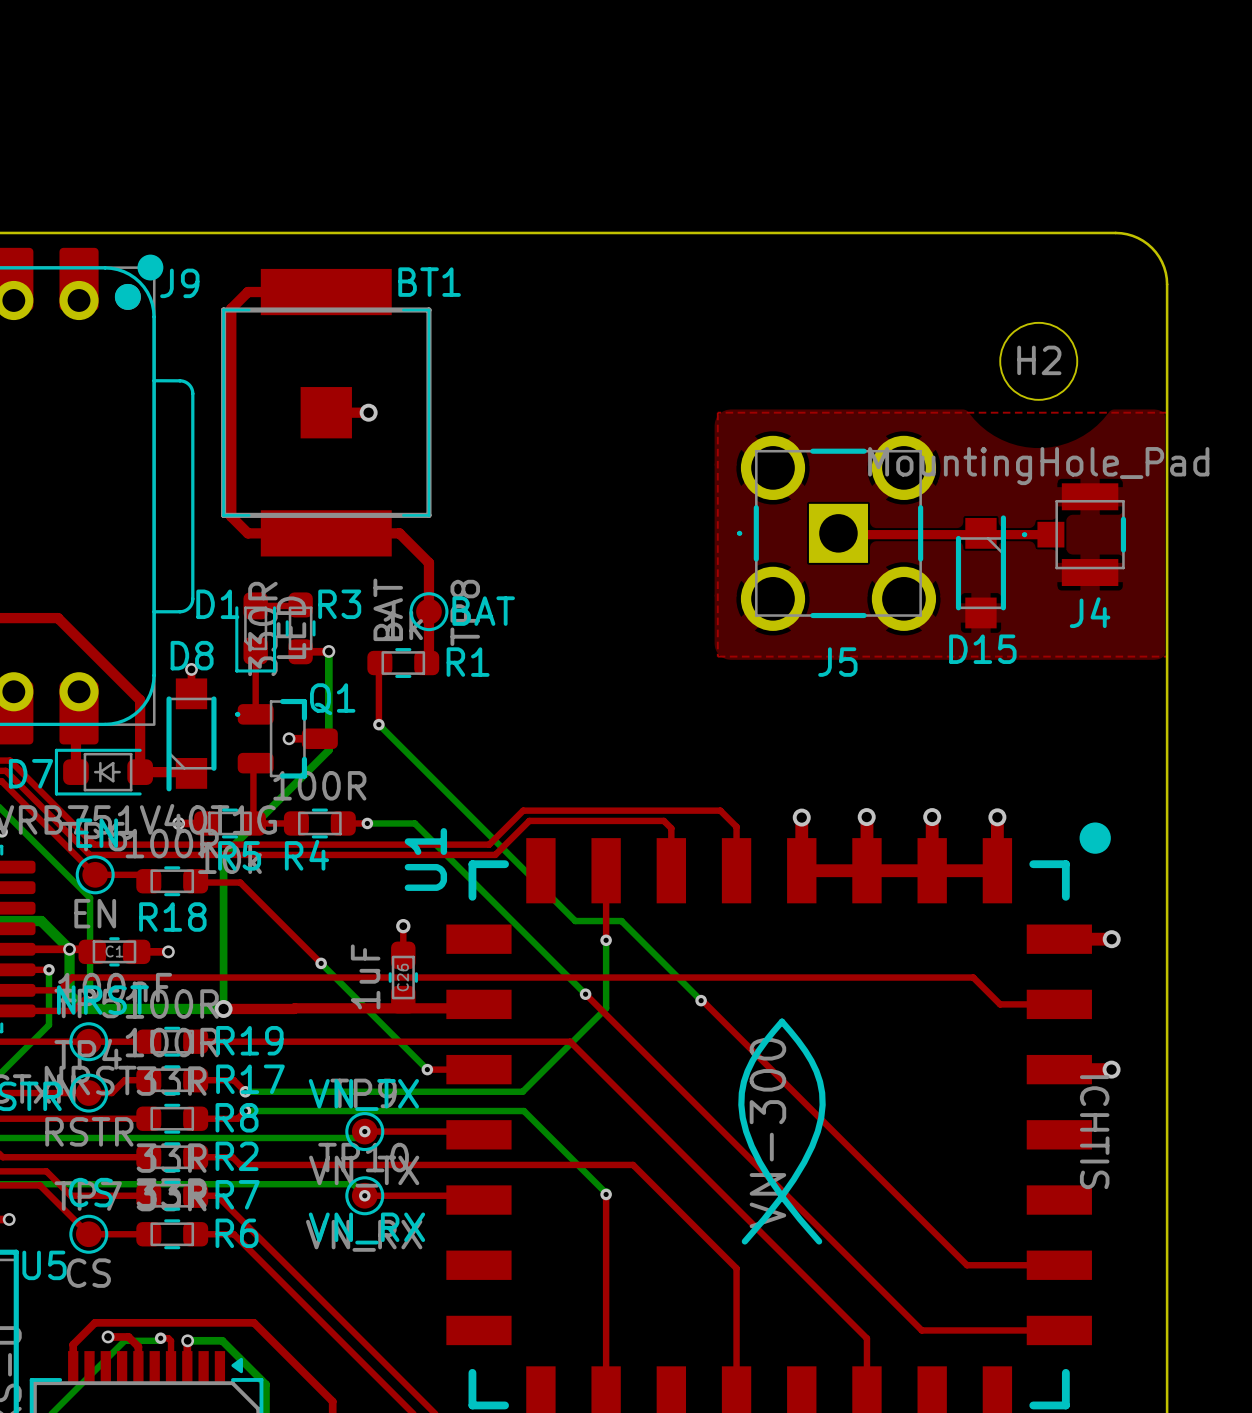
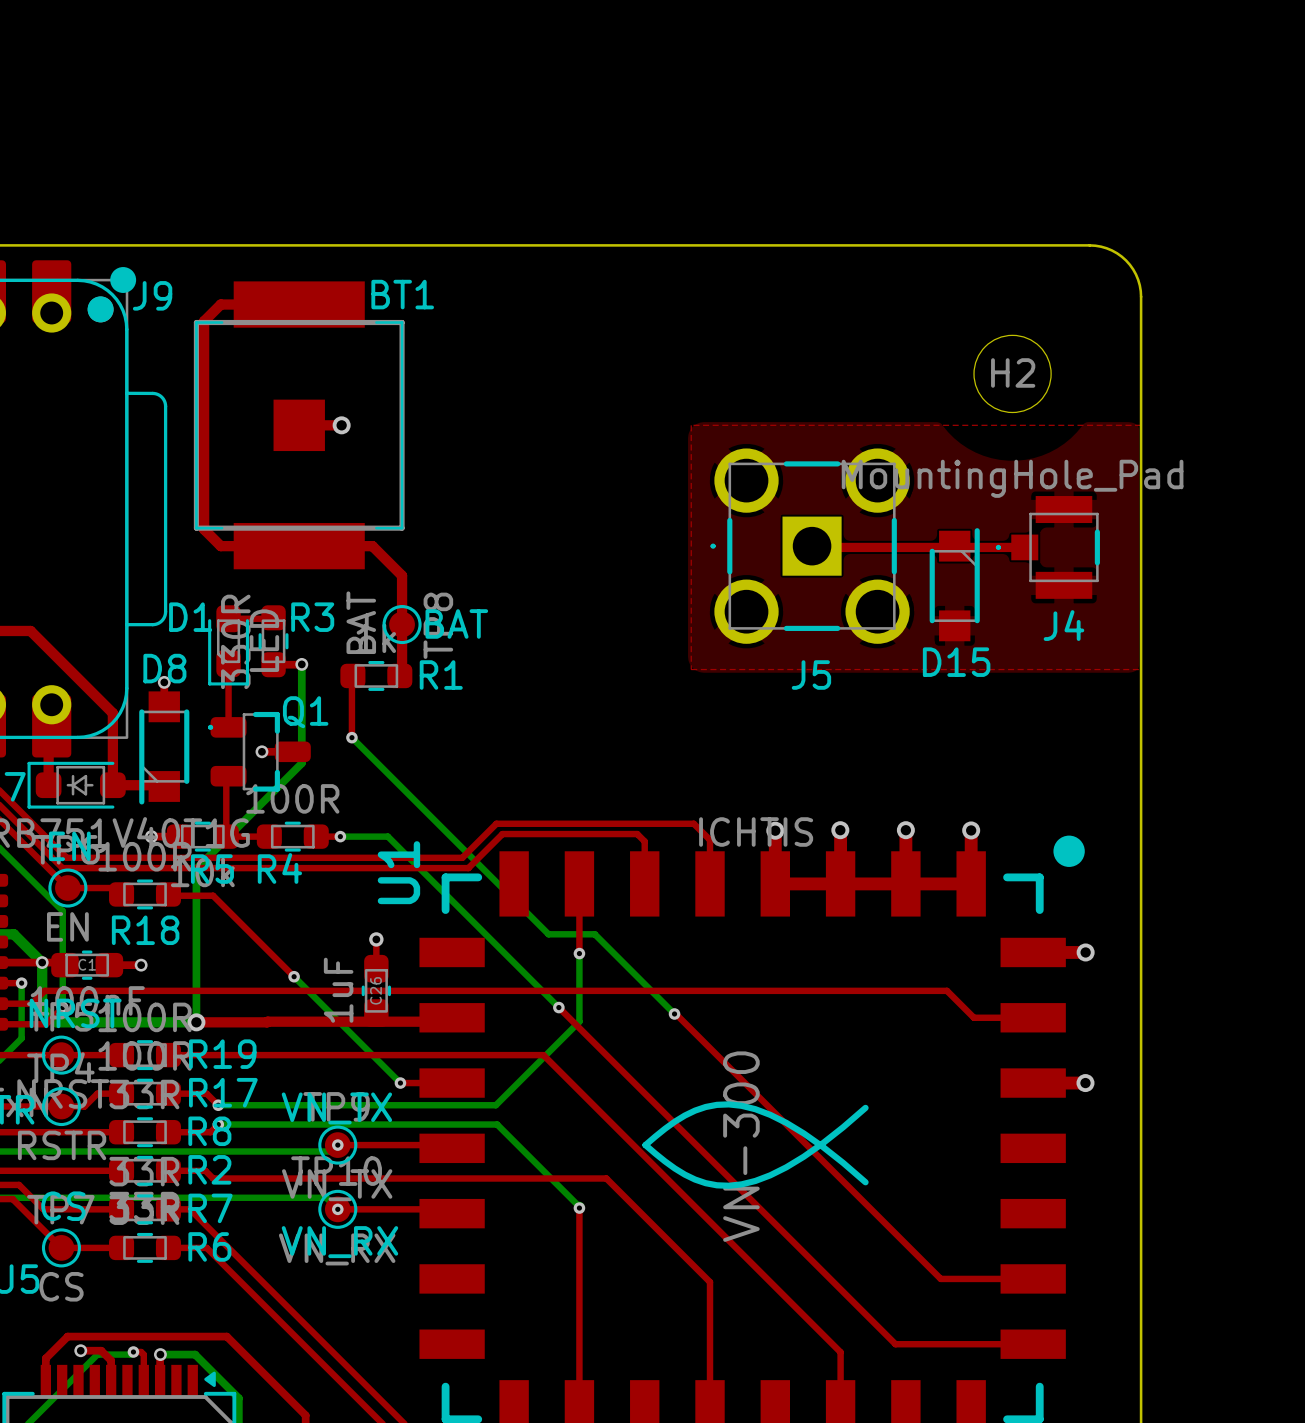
drawing shape: [738, 1018, 1110, 1245] -> [642, 817, 869, 1189]

